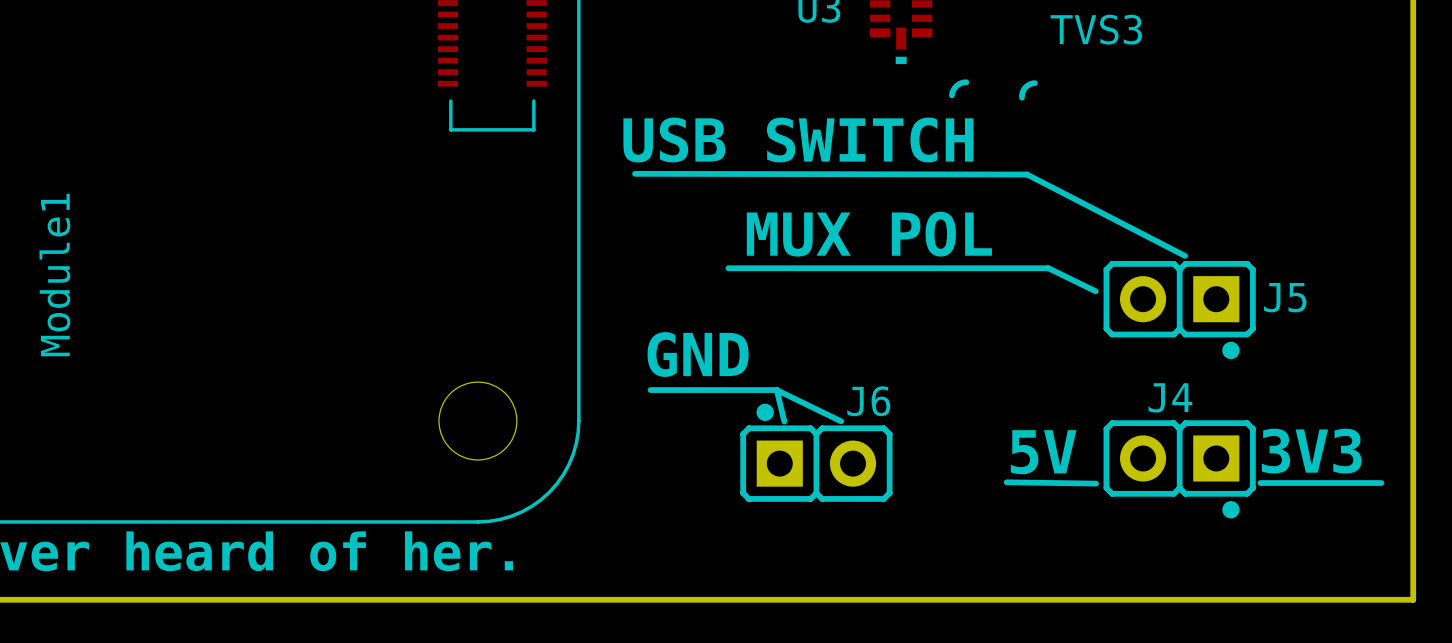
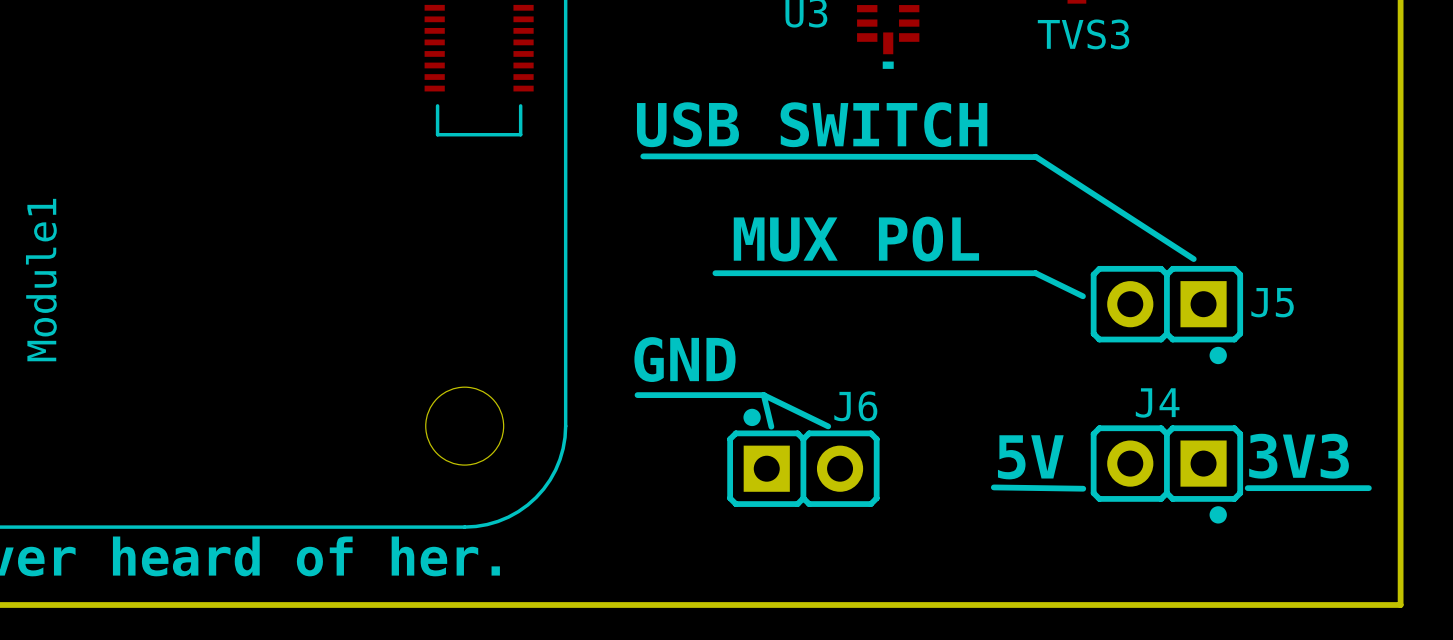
line: (966, 82) (956, 85) (951, 95) -> none
line: (1034, 83) (1025, 87) (1021, 97) -> none
text position: USB SWITCH (798, 140) -> USB SWITCH (812, 124)
line: none -> (643, 156) (1035, 157)
line: none -> (1035, 156) (1193, 259)
line: (635, 173) (1027, 174) (1185, 255) -> none

